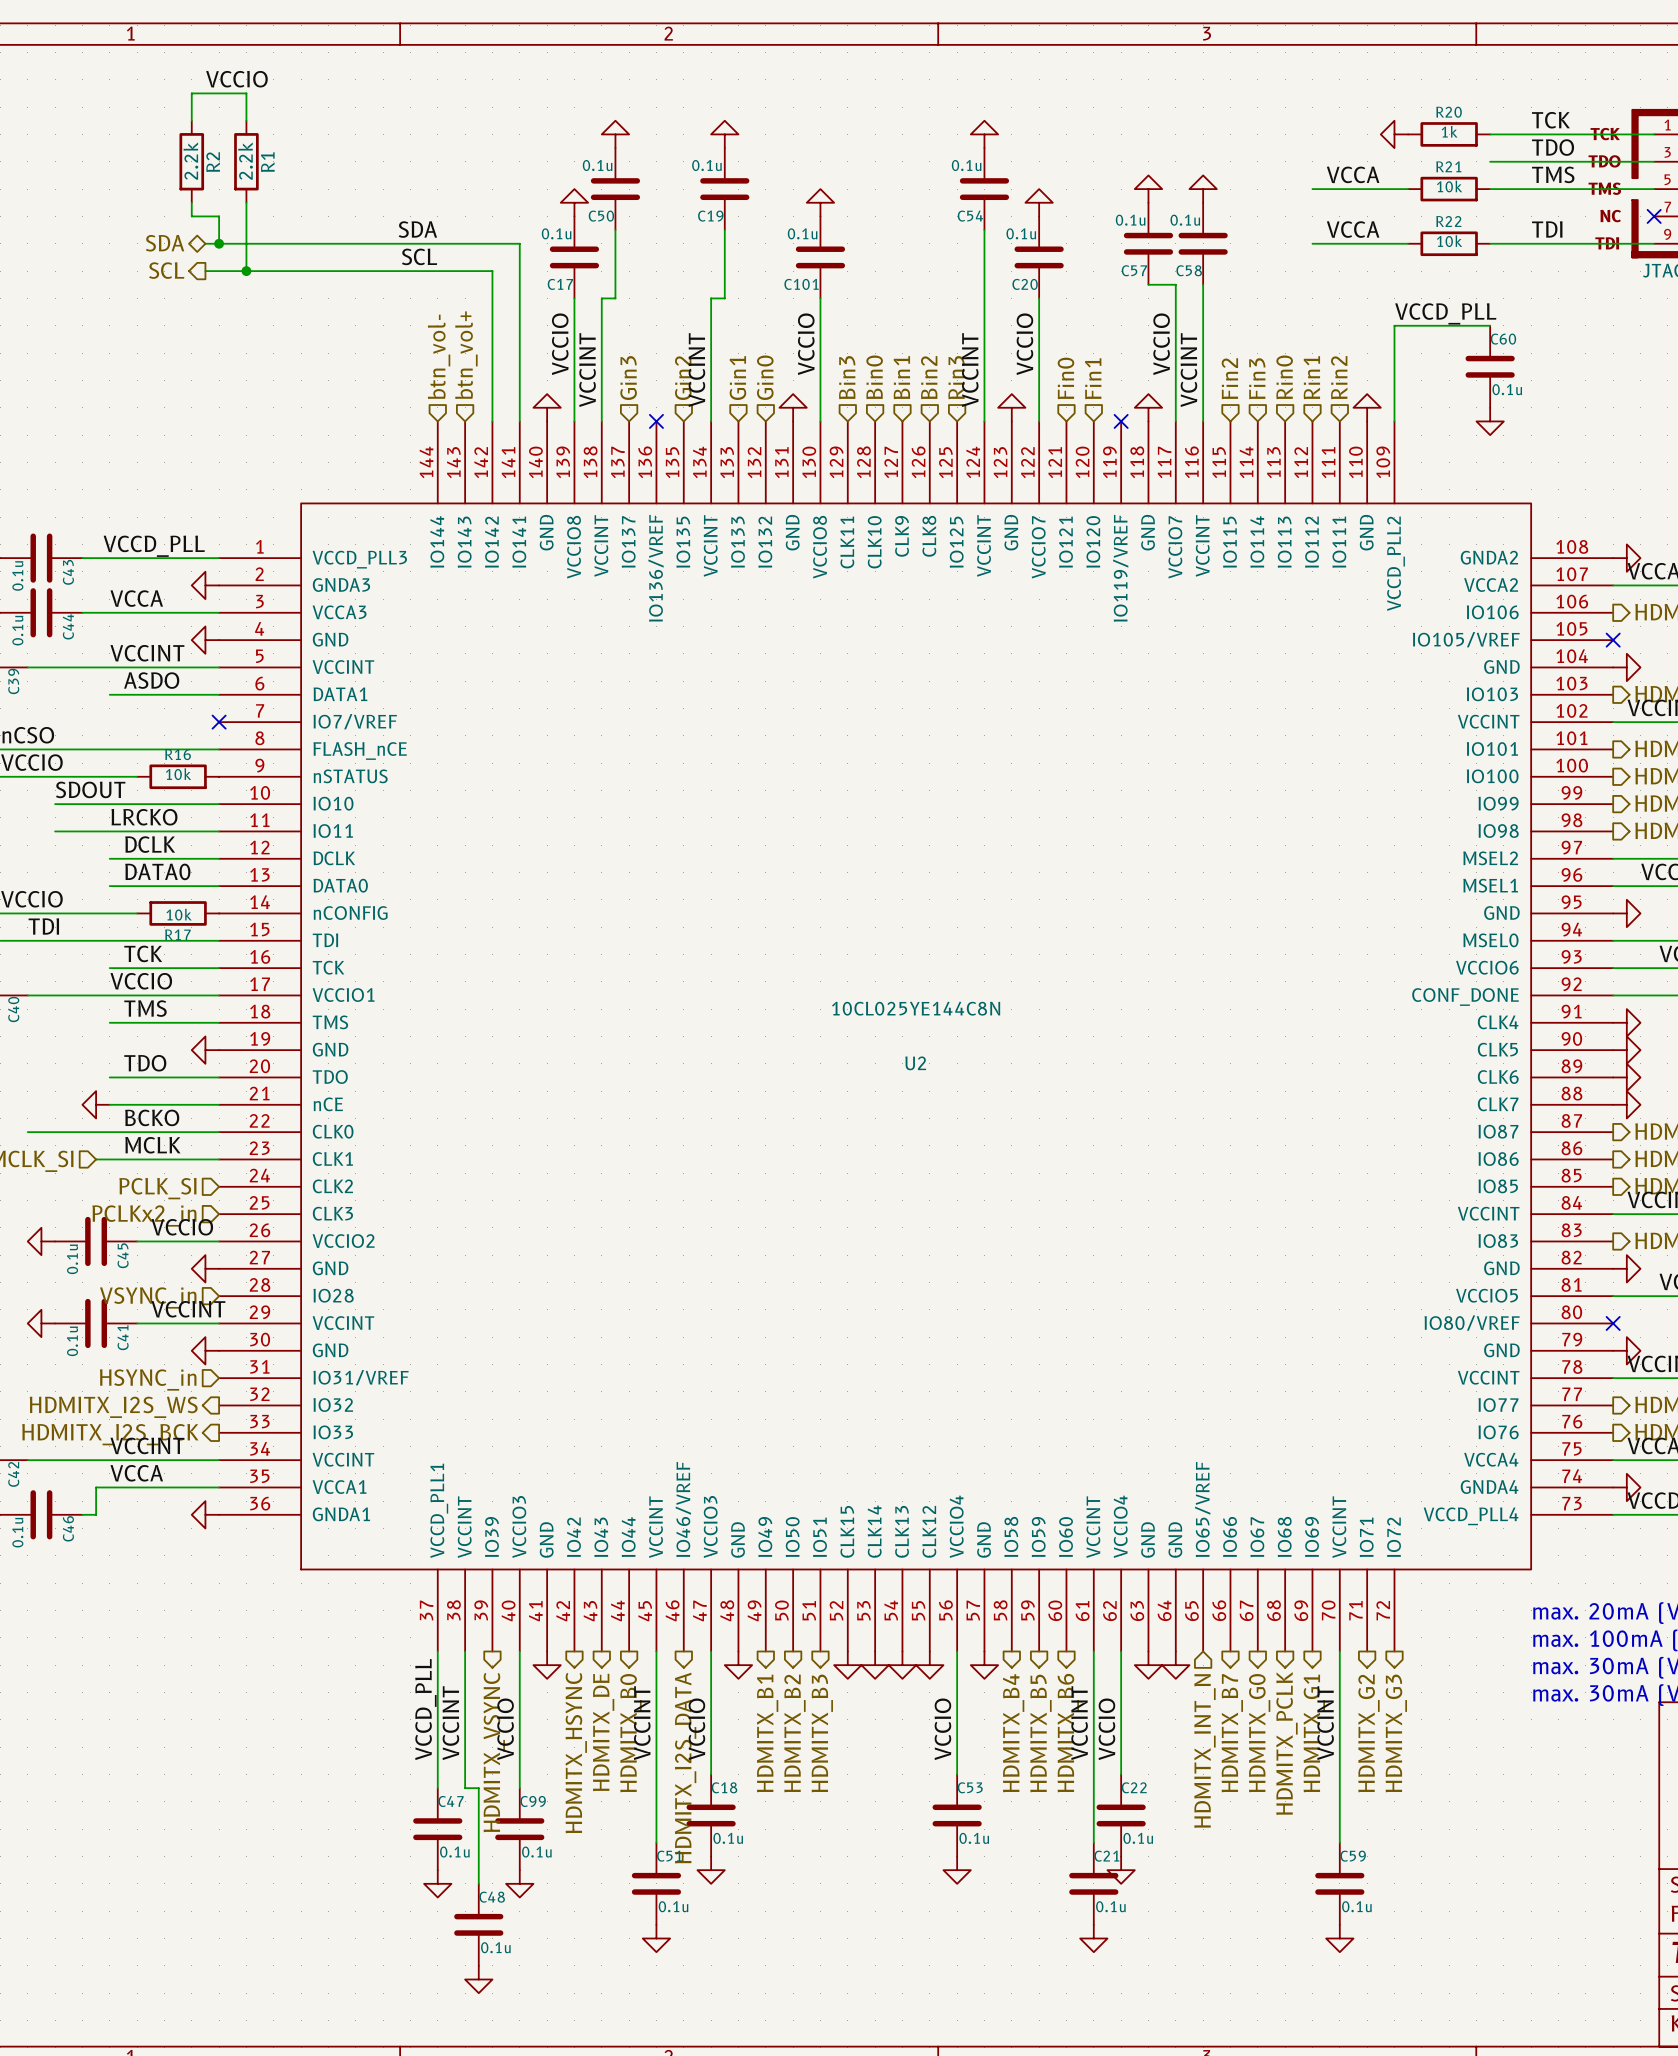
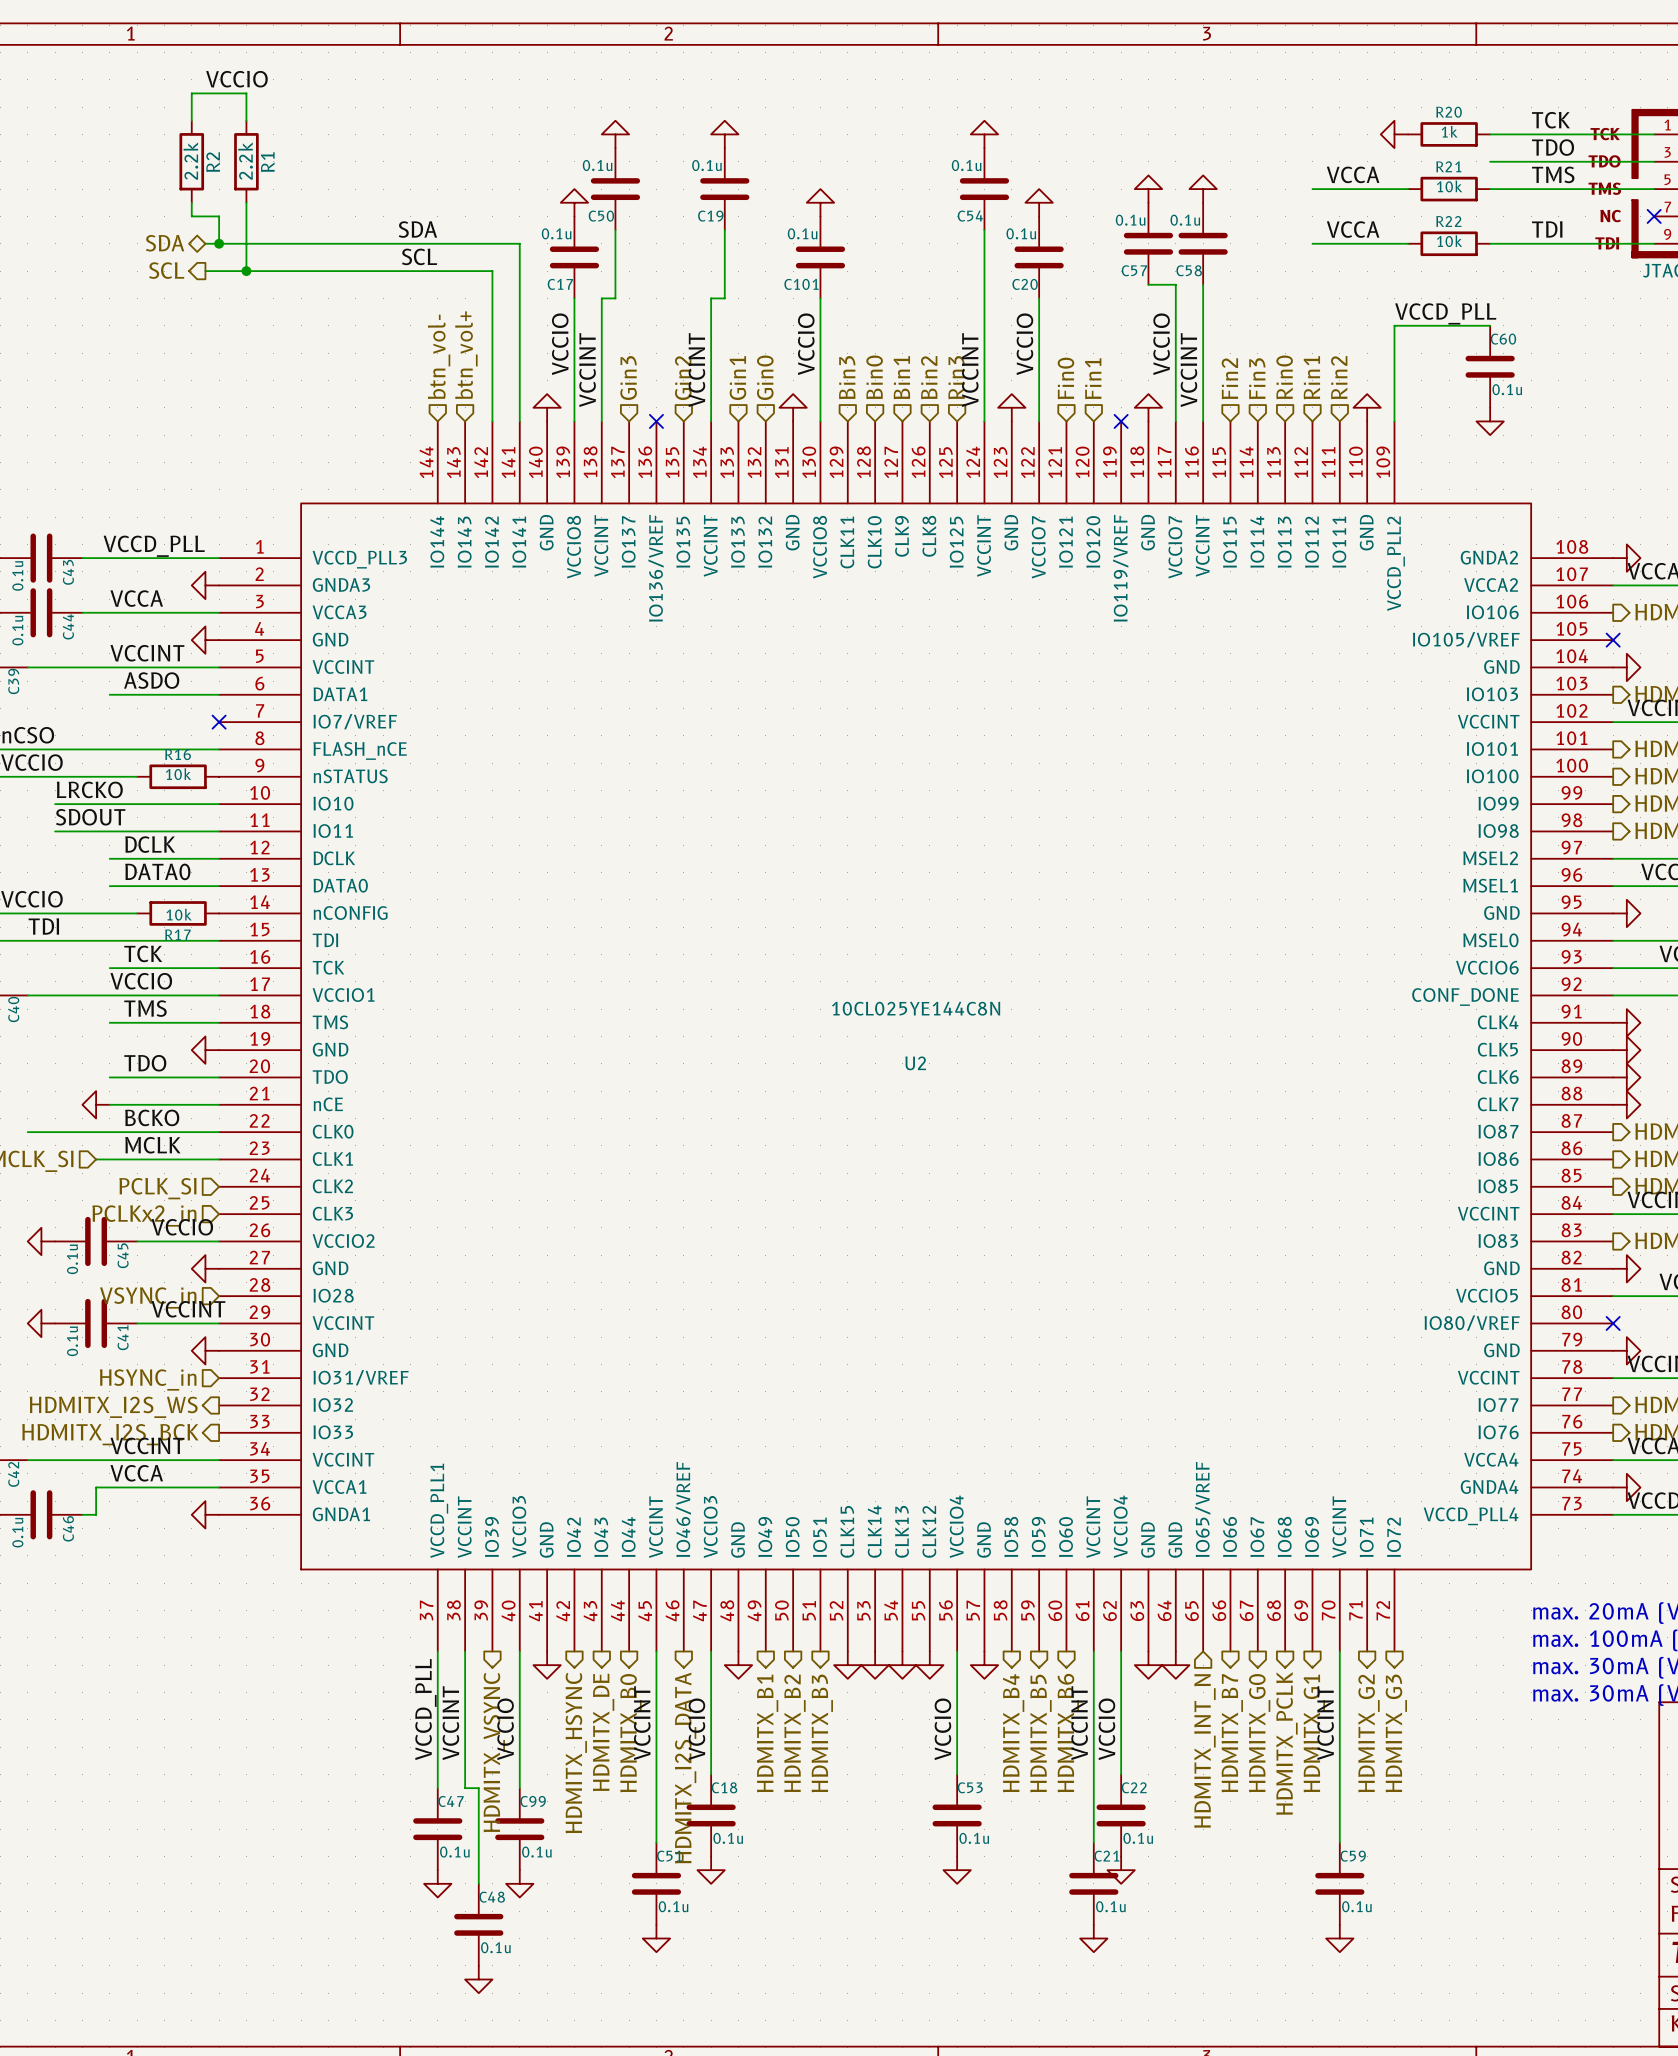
label: SDOUT (90, 789) -> LRCKO (89, 789)
label: none -> SDOUT (90, 817)
label: LRCKO (144, 817) -> none

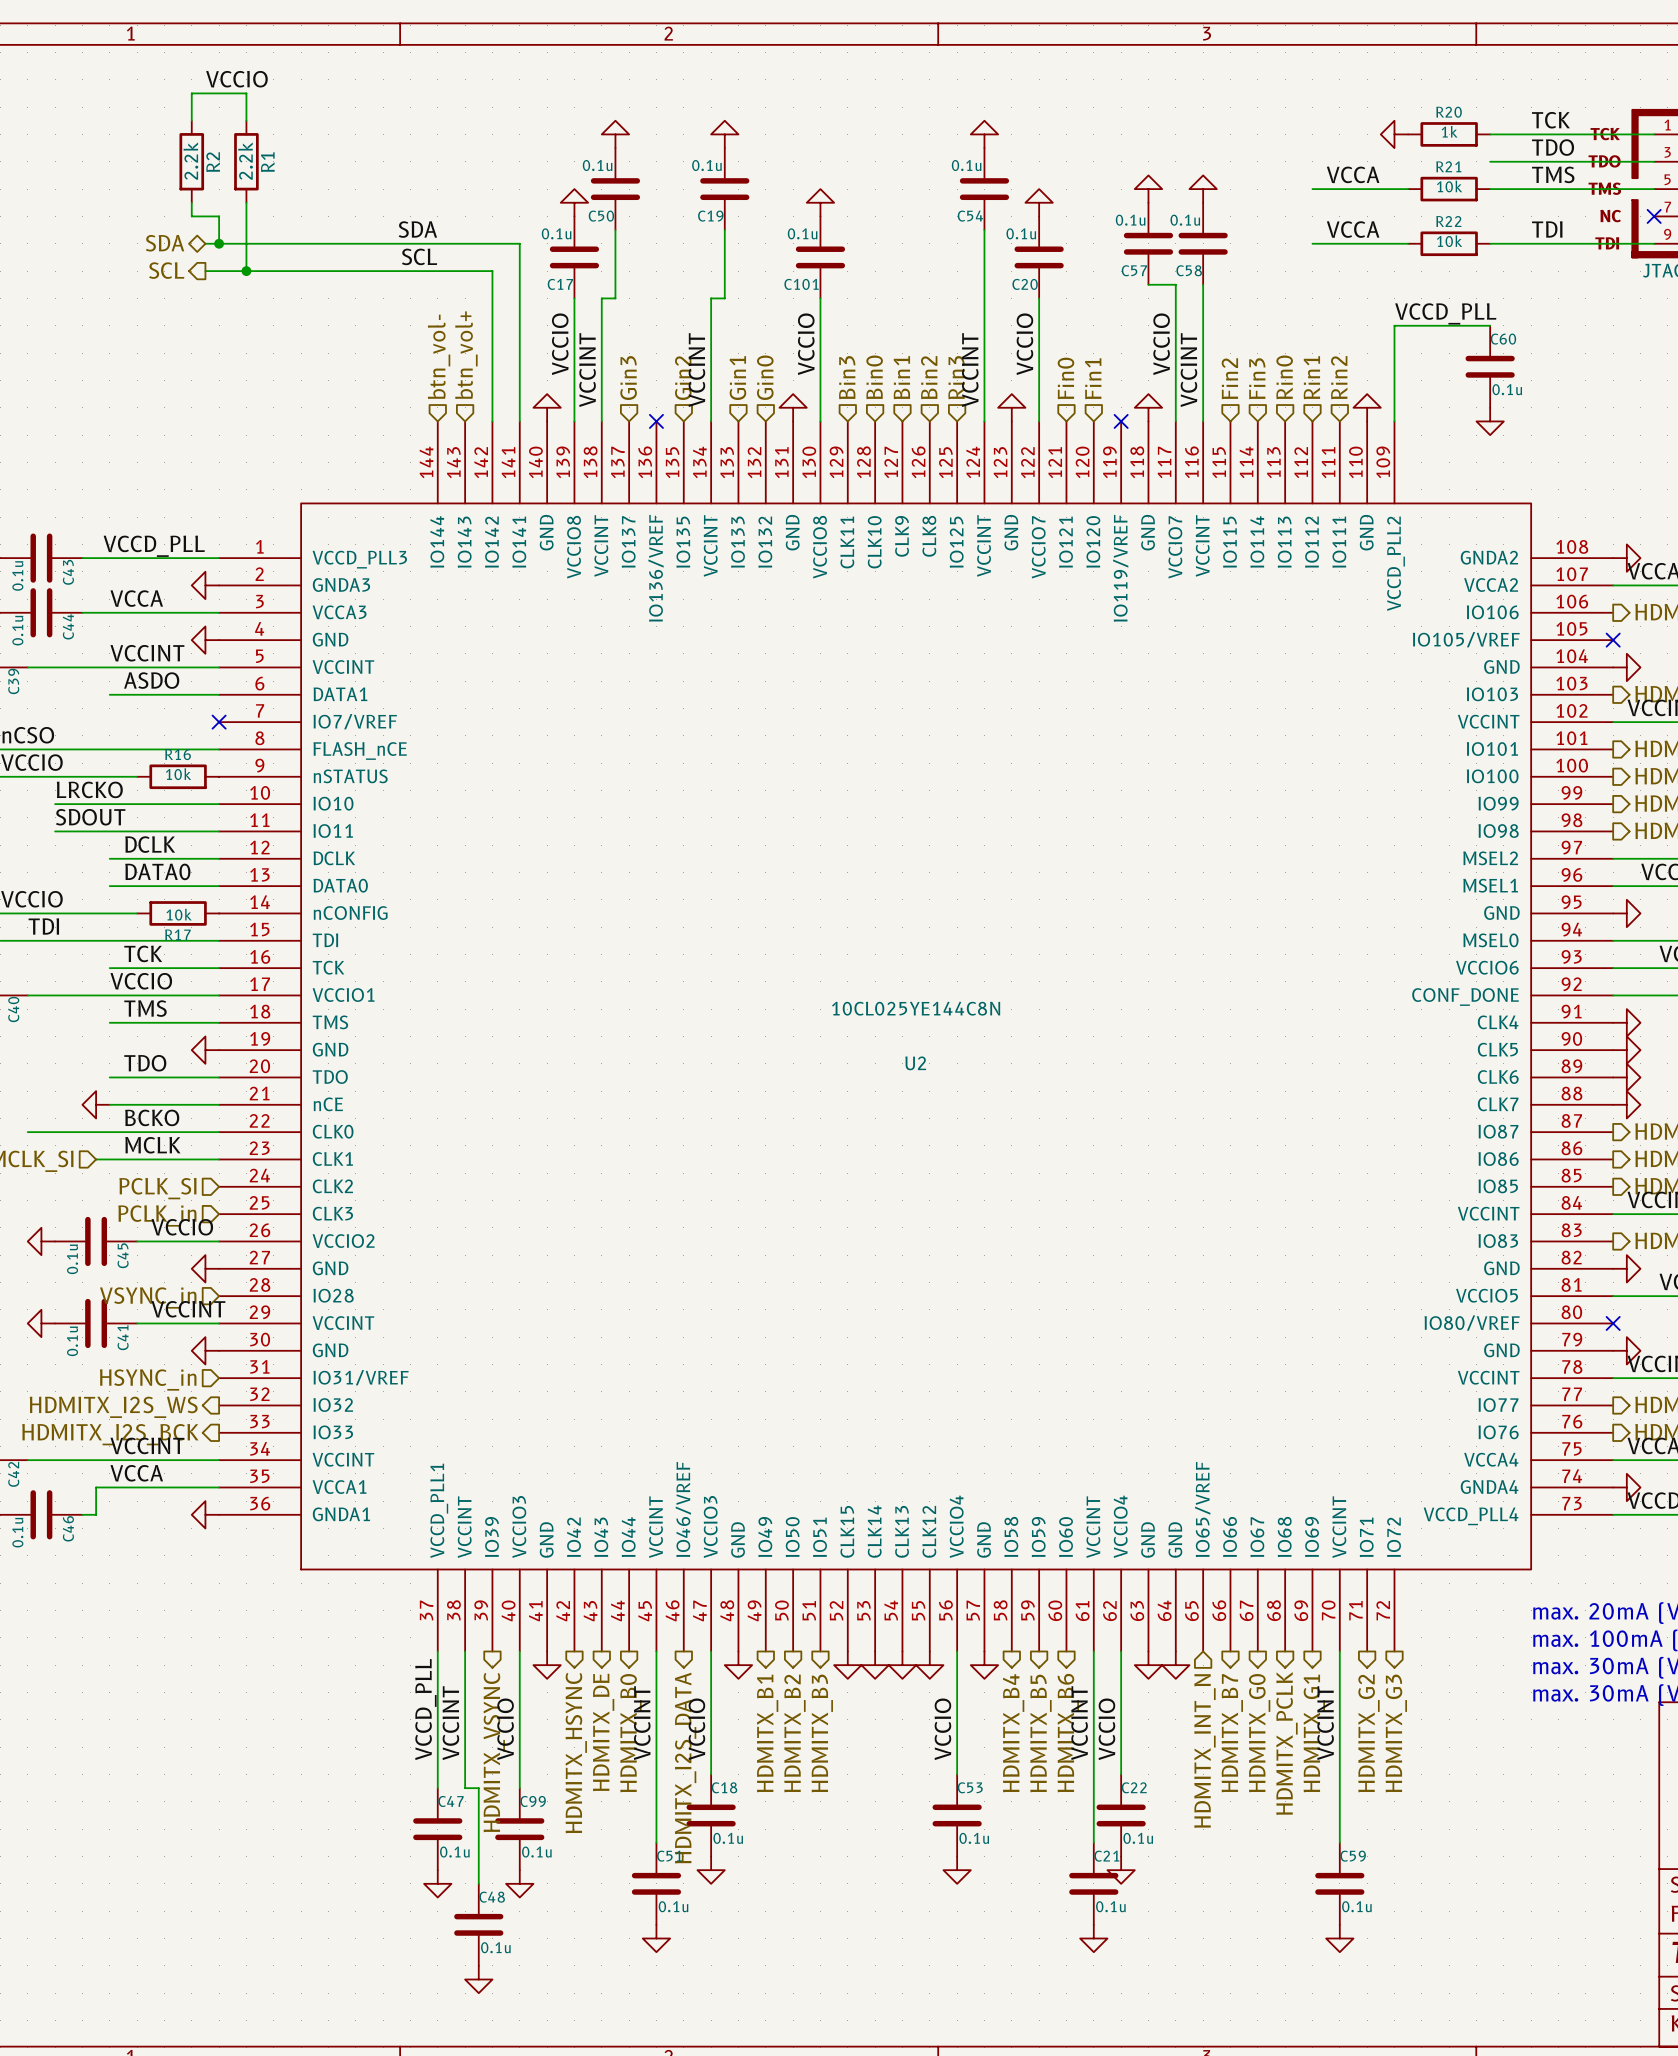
hierarchical label: PCLKx2_in (144, 1215) -> PCLK_in (157, 1215)

